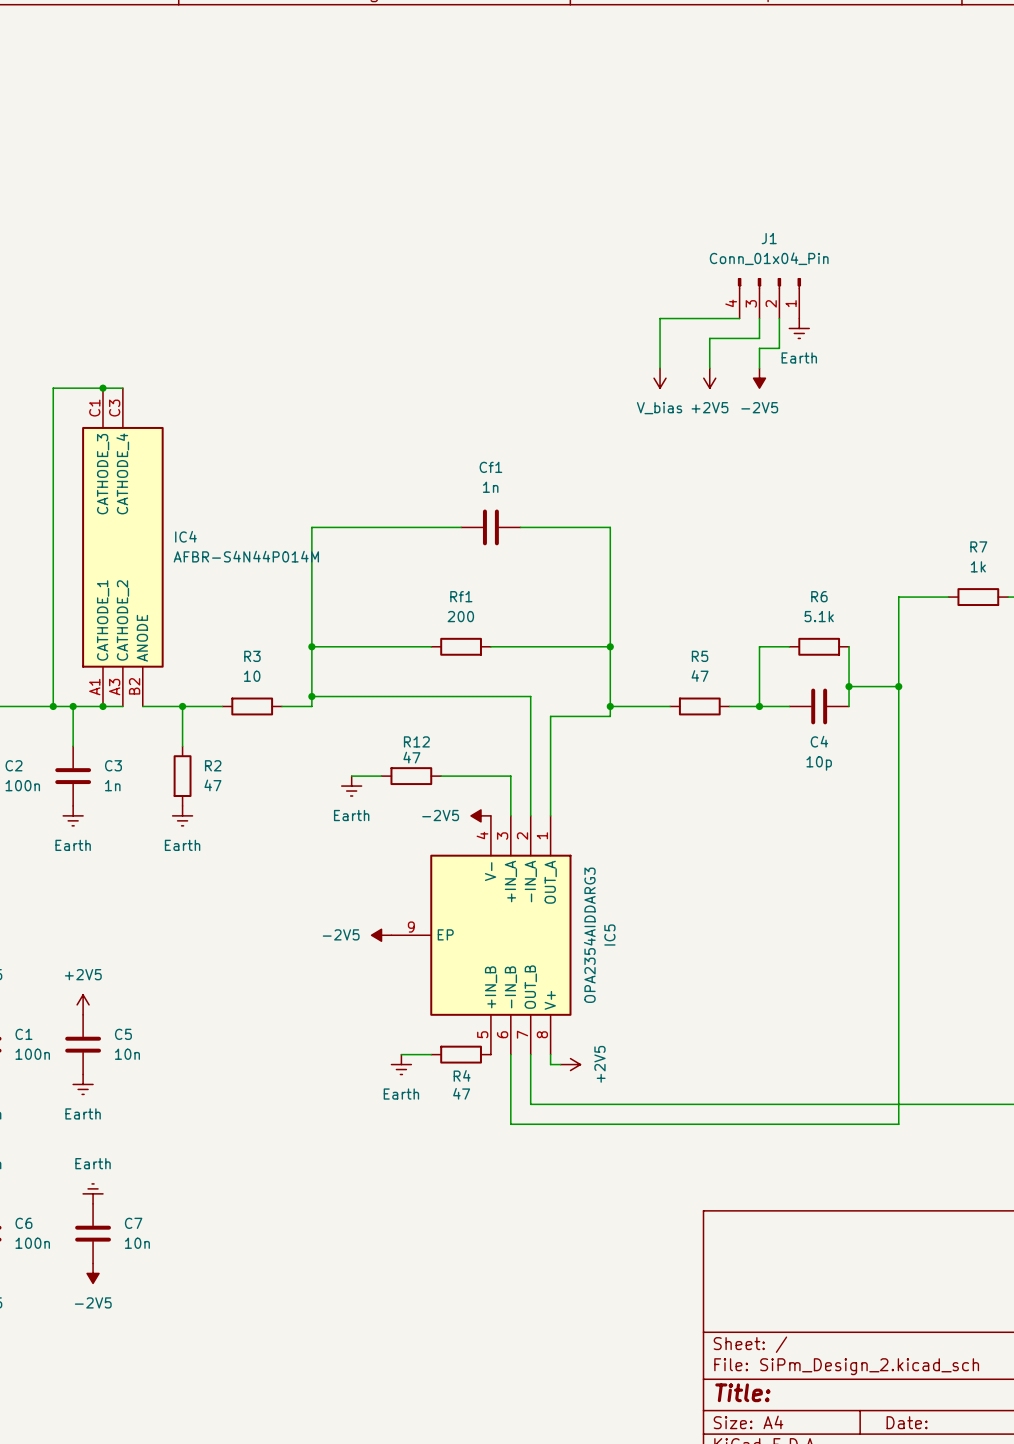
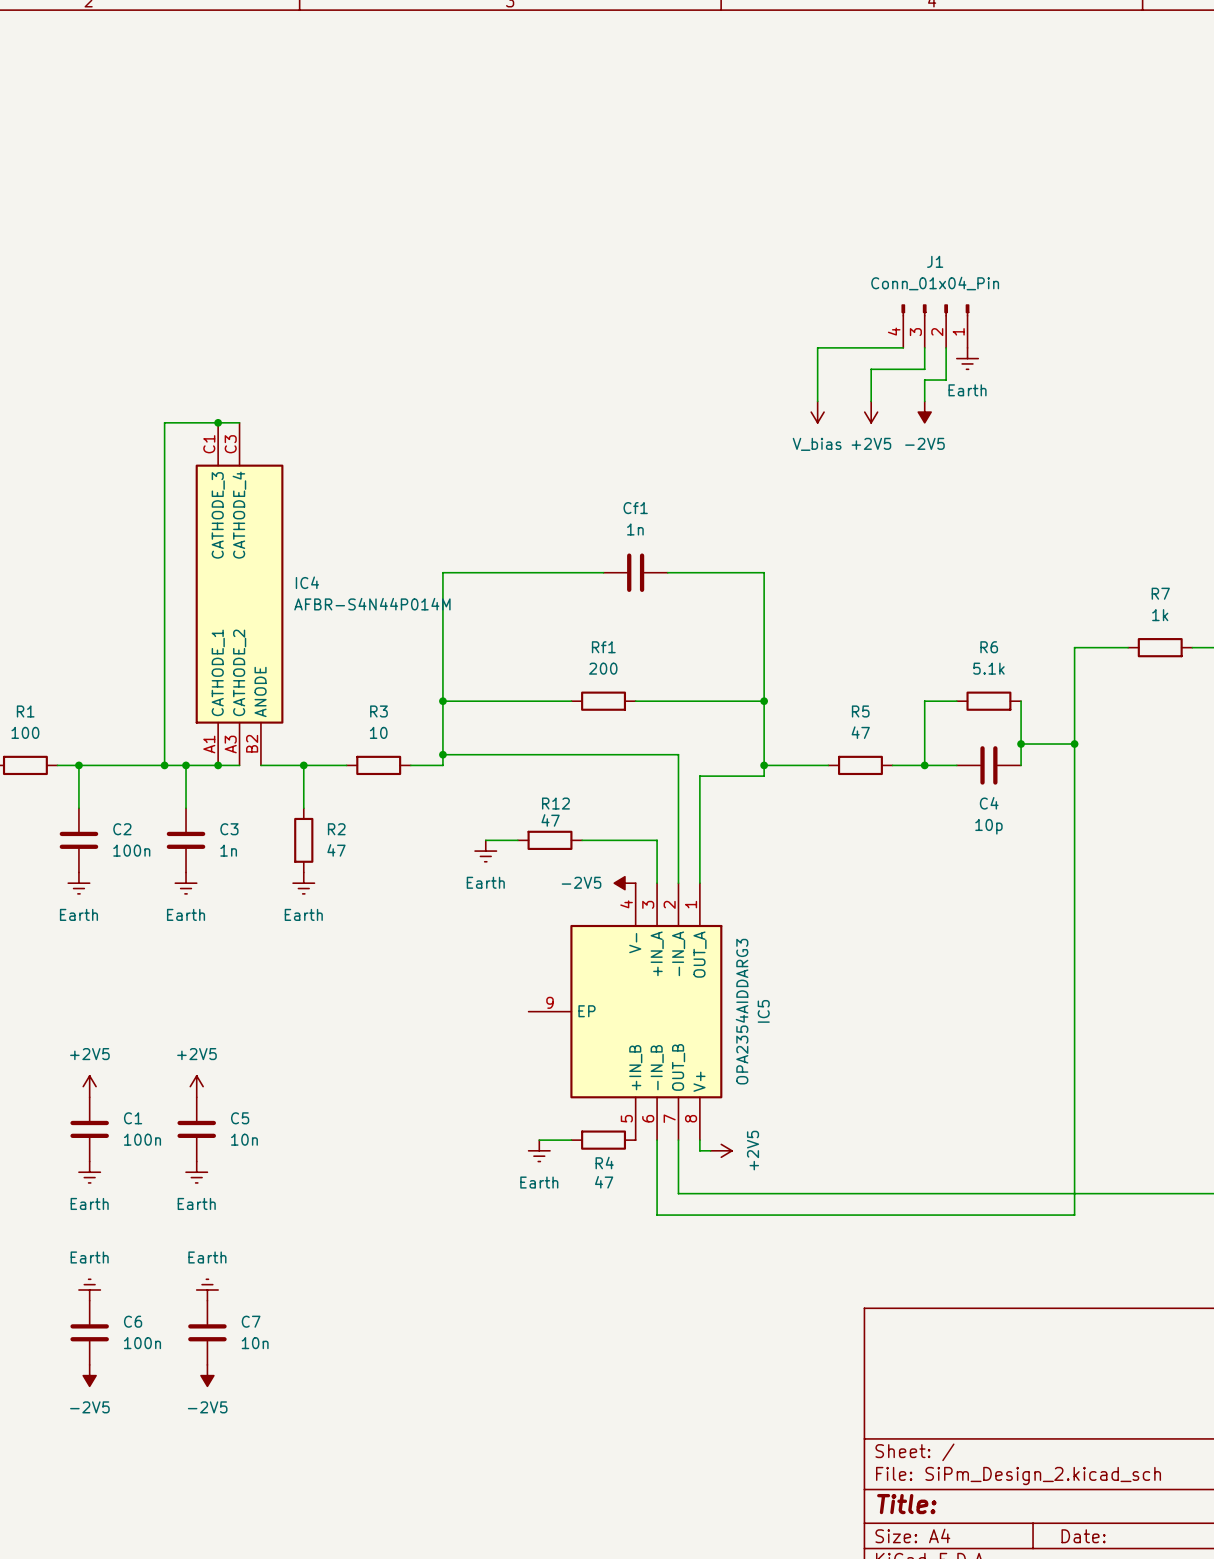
power symbol: -2V5 (381, 935) -> none

